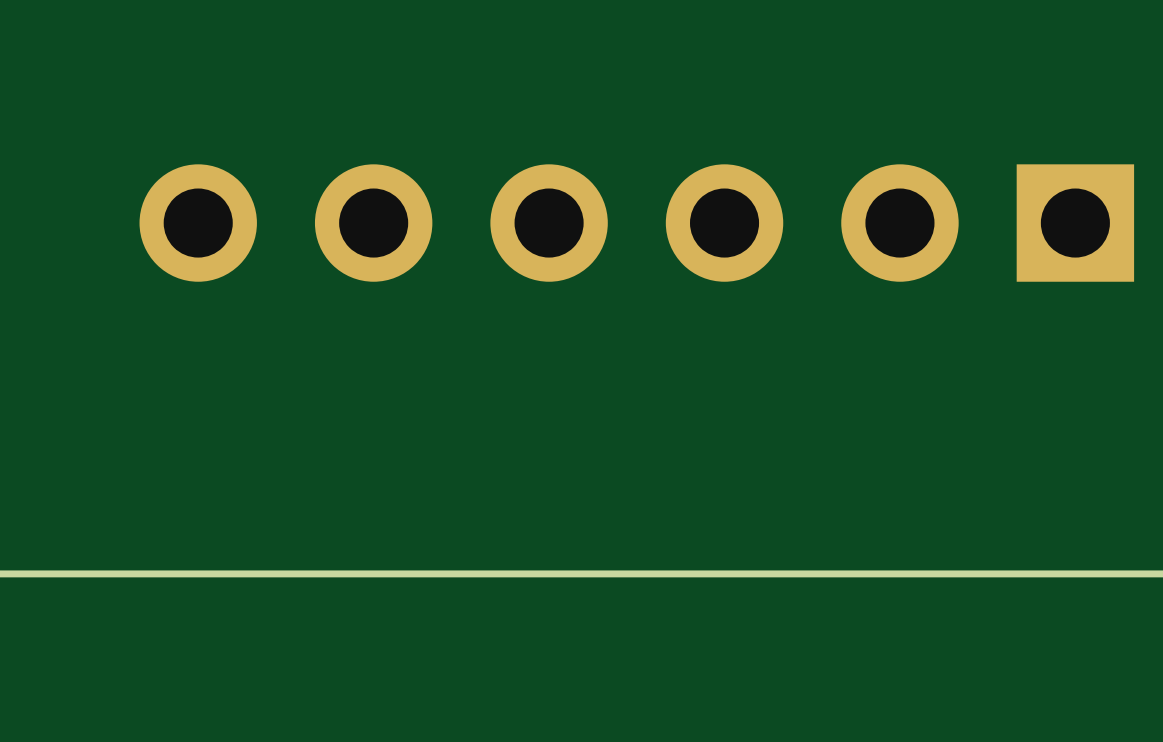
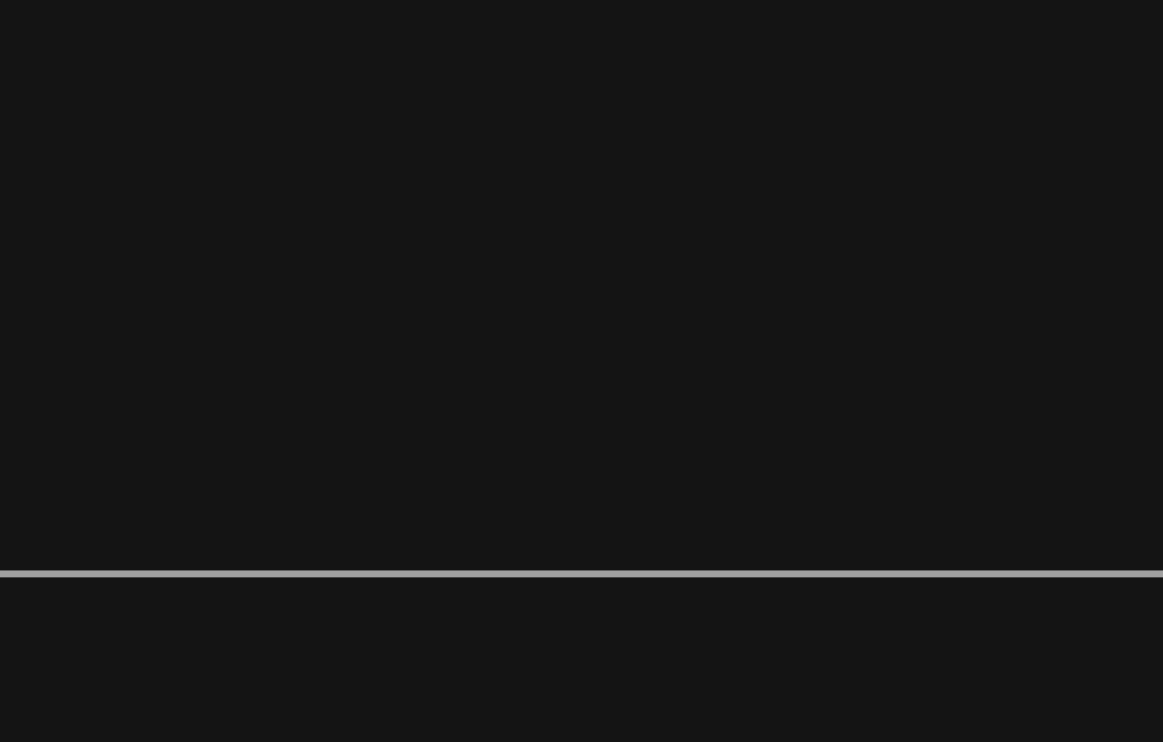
part: (636, 223) -> none

